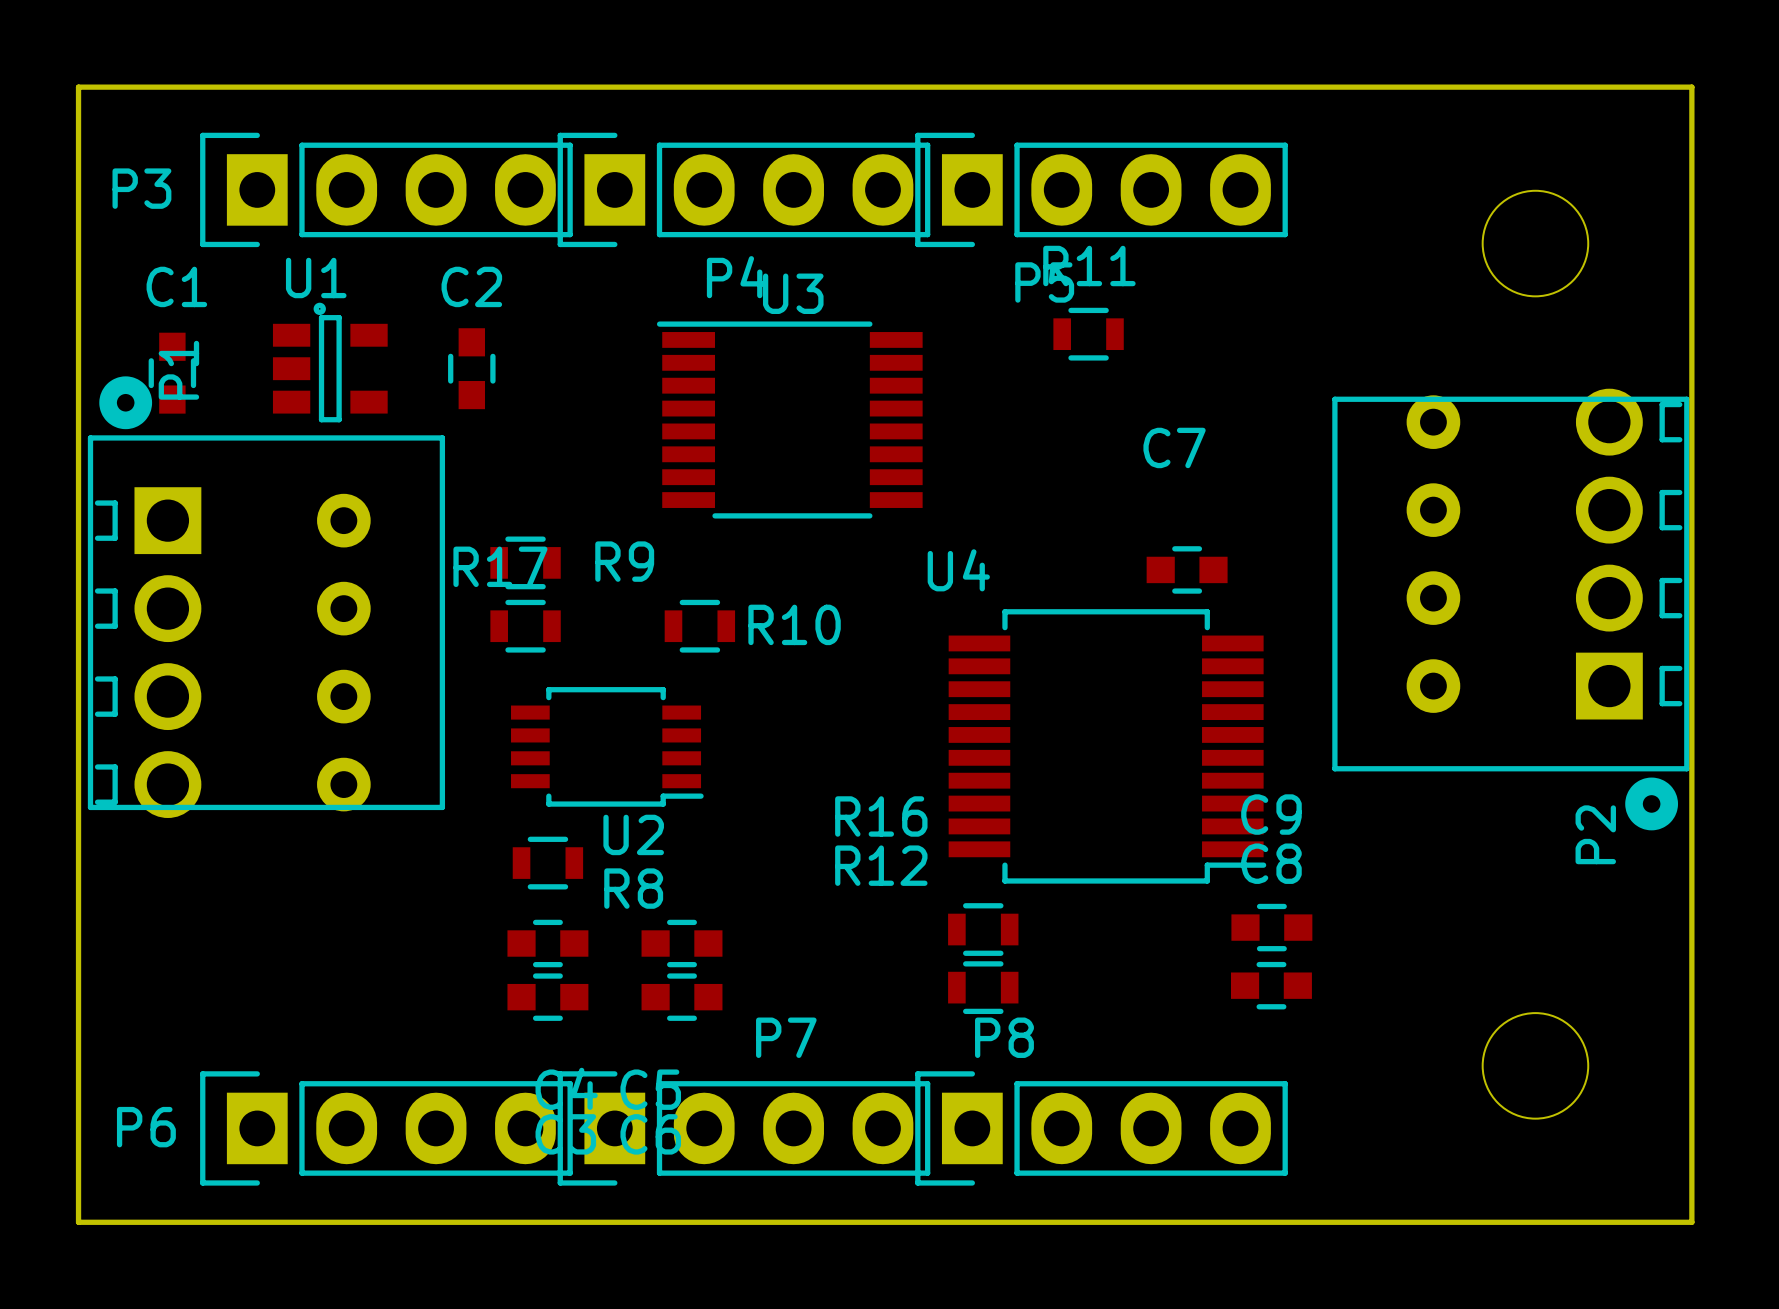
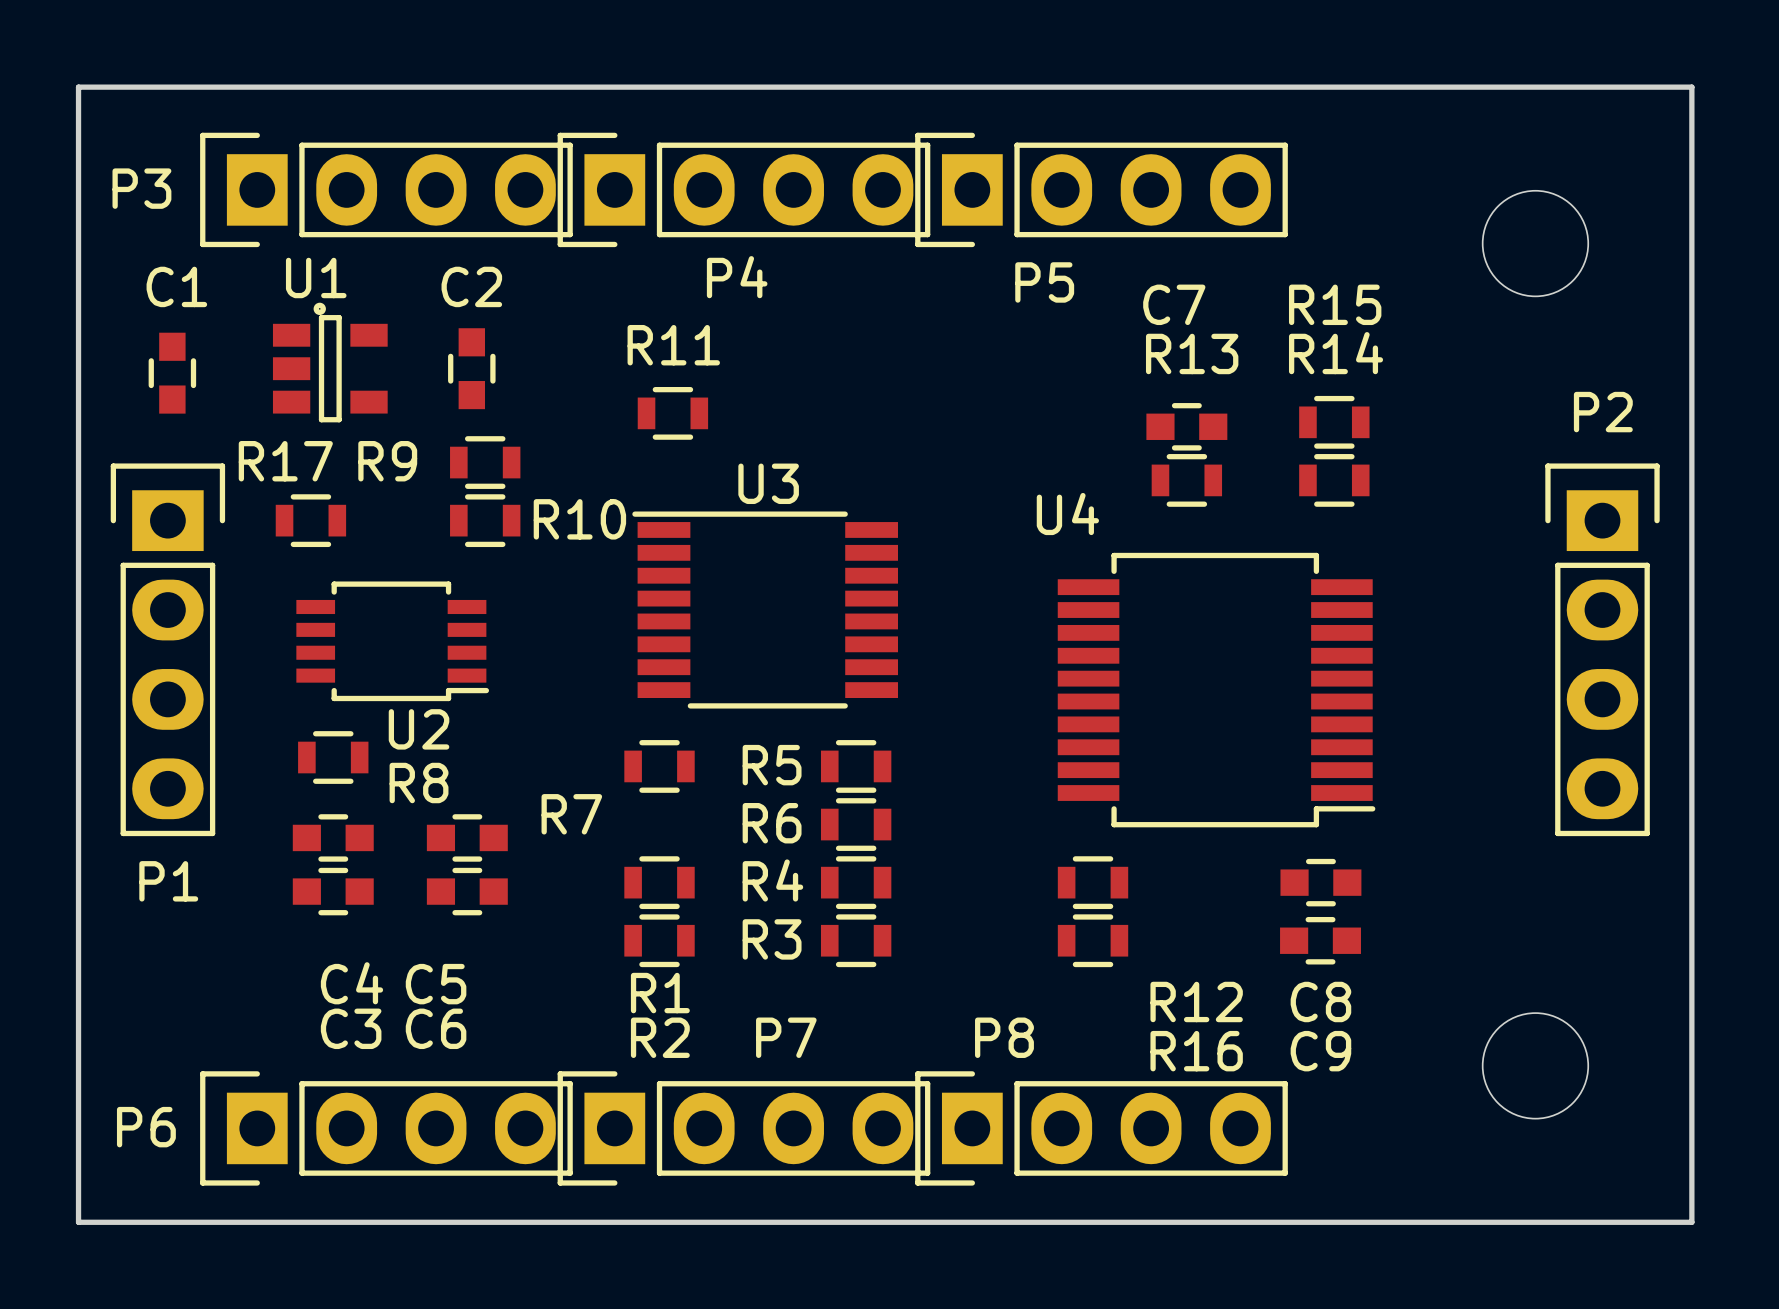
R11 position: (1088, 334) -> (672, 413)
P1 name position: P1 (178, 370) -> P1 (168, 881)
P1 footprint: [87, 376, 446, 818] -> [110, 463, 226, 837]
P2 footprint: [1332, 388, 1690, 831] -> [1545, 463, 1660, 837]
U3 position: (789, 420) -> (765, 610)
R15: none -> (1334, 422)
R13: none -> (1186, 480)
R14: none -> (1334, 480)
R9 name position: R9 (624, 561) -> R9 (387, 461)
R9 position: (525, 562) -> (485, 462)
C7 position: (1187, 569) -> (1186, 426)
R17 position: (525, 626) -> (310, 520)
R10 position: (699, 626) -> (485, 520)
U2 position: (607, 746) -> (392, 641)
U4 position: (1107, 746) -> (1216, 690)
R7: none -> (659, 766)
R5: none -> (856, 766)
C9 name position: C9 (1271, 814) -> C9 (1320, 1051)
R16 name position: R16 (881, 816) -> R16 (1196, 1051)
R6: none -> (856, 824)
P2 name position: P2 (1595, 834) -> P2 (1603, 412)
R8 position: (547, 863) -> (333, 757)
C8 name position: C8 (1271, 863) -> C8 (1320, 1001)
R12 name position: R12 (881, 865) -> R12 (1196, 1001)
R1: none -> (659, 882)
R4: none -> (856, 882)
C9 position: (1271, 927) -> (1320, 940)
R16 position: (983, 929) -> (1093, 940)
R2: none -> (659, 940)
R3: none -> (856, 940)
C4 position: (547, 943) -> (333, 837)
C5 position: (682, 943) -> (467, 837)
C8 position: (1271, 985) -> (1320, 882)
R12 position: (983, 987) -> (1093, 882)
C3 position: (547, 997) -> (333, 891)
C6 position: (682, 997) -> (467, 891)

